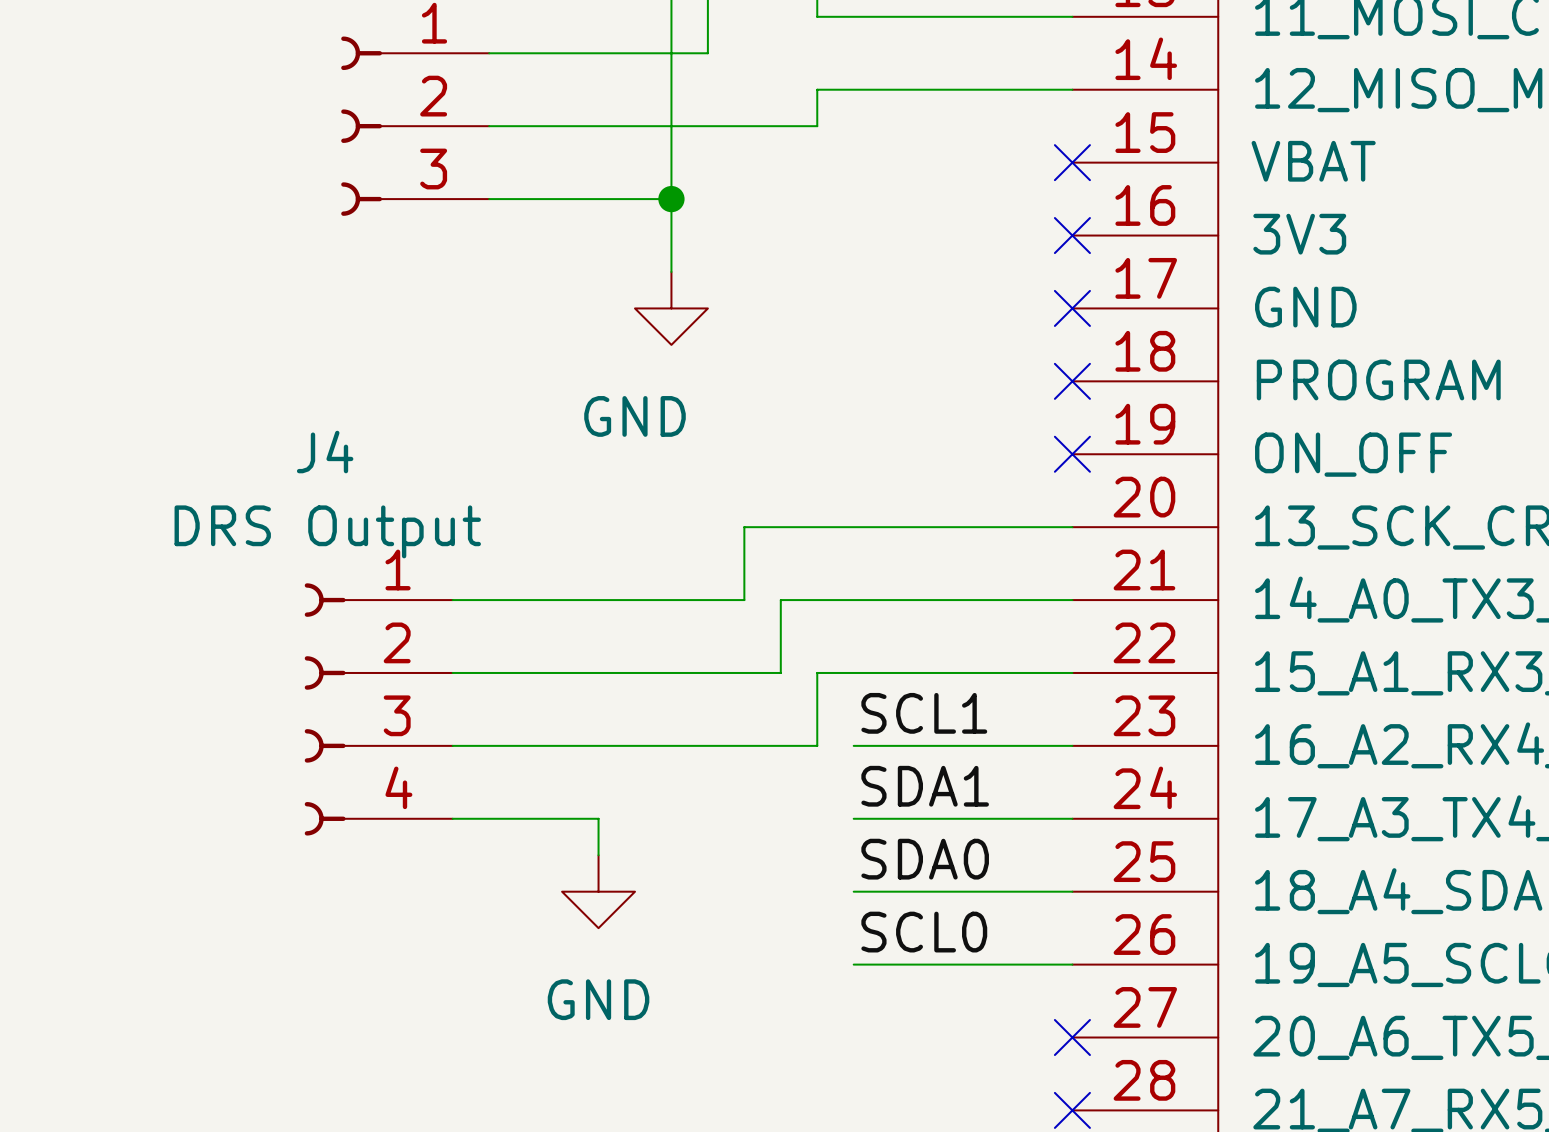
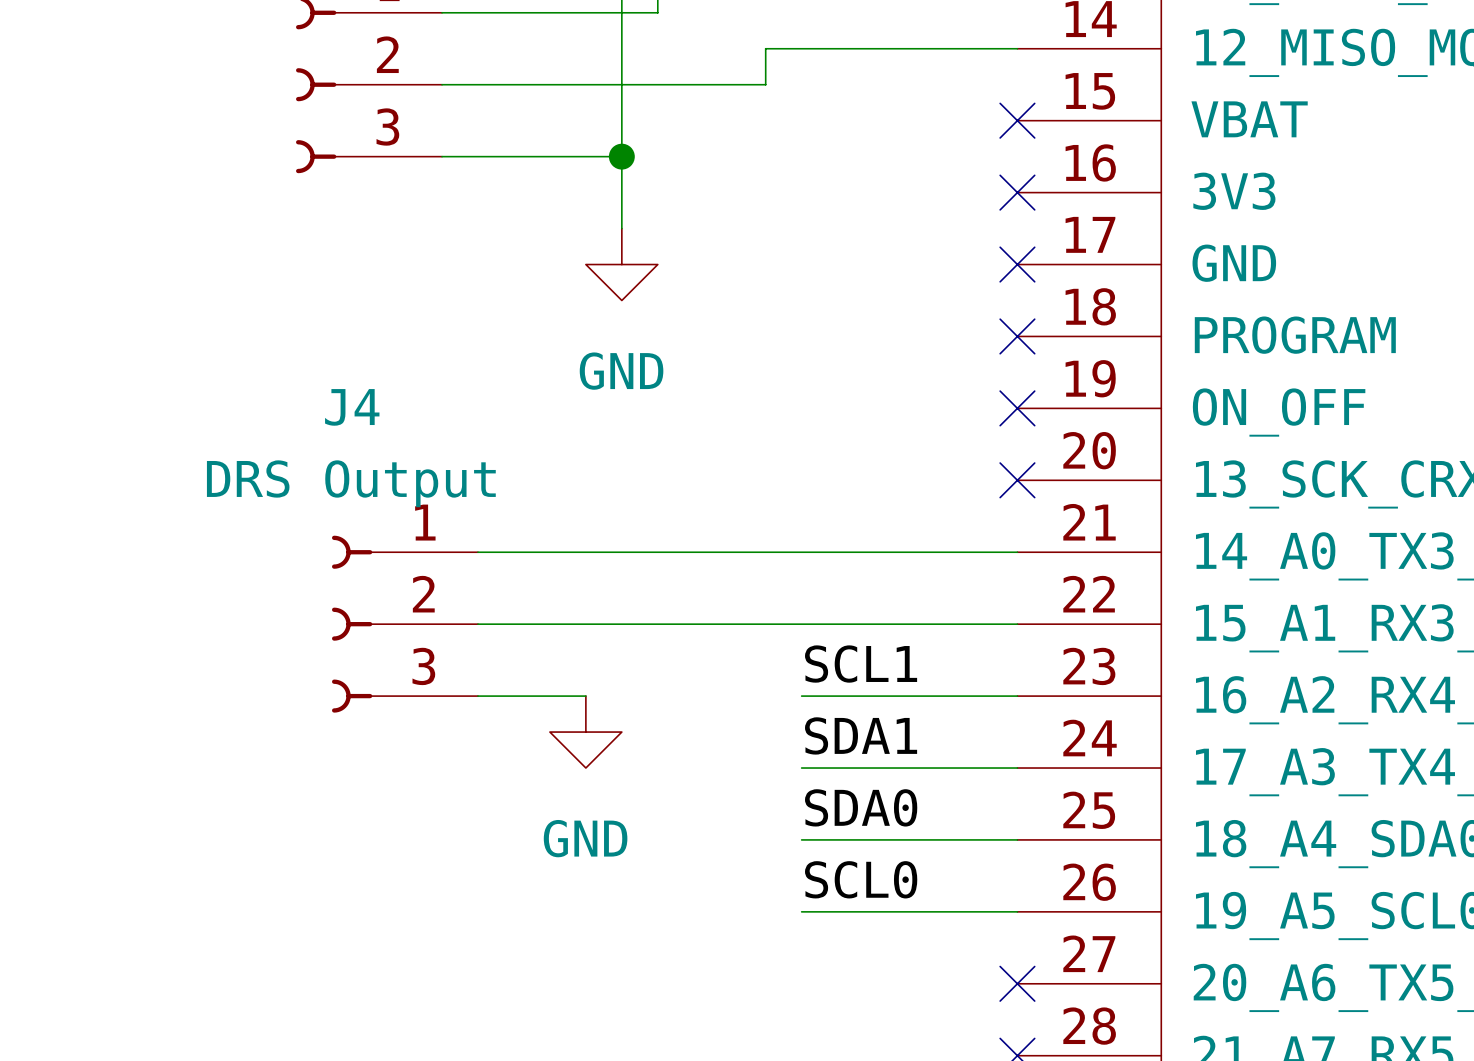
power symbol text position: GND (634, 416) -> GND (621, 371)
wire: (1072, 527) (744, 527) (744, 600) -> none
no-connect mark: none -> (1017, 480)
J4 symbol: [304, 583, 453, 836] -> [331, 535, 478, 713]
wire: (780, 600) (780, 672) -> (729, 552) (693, 552)
wire: (817, 672) (817, 745) (634, 745) -> (765, 624) (729, 624)
wire: (452, 818) (598, 818) (598, 855) -> none
power symbol position: GND (598, 891) -> GND (585, 732)

